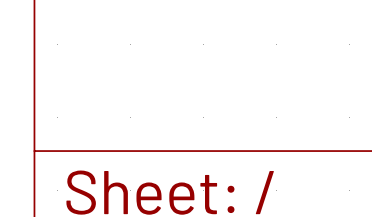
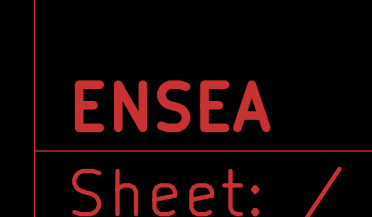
title block: none -> ENSEA (172, 106)

